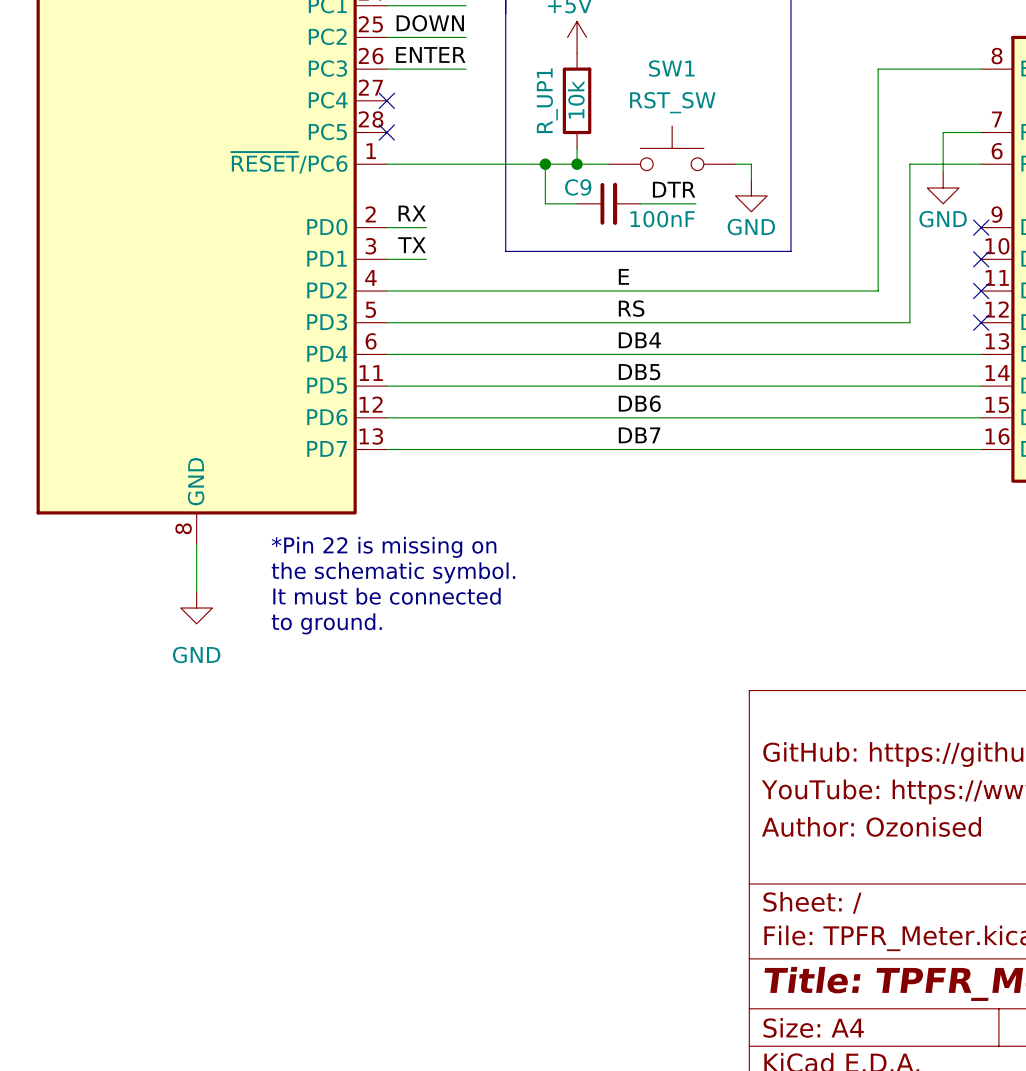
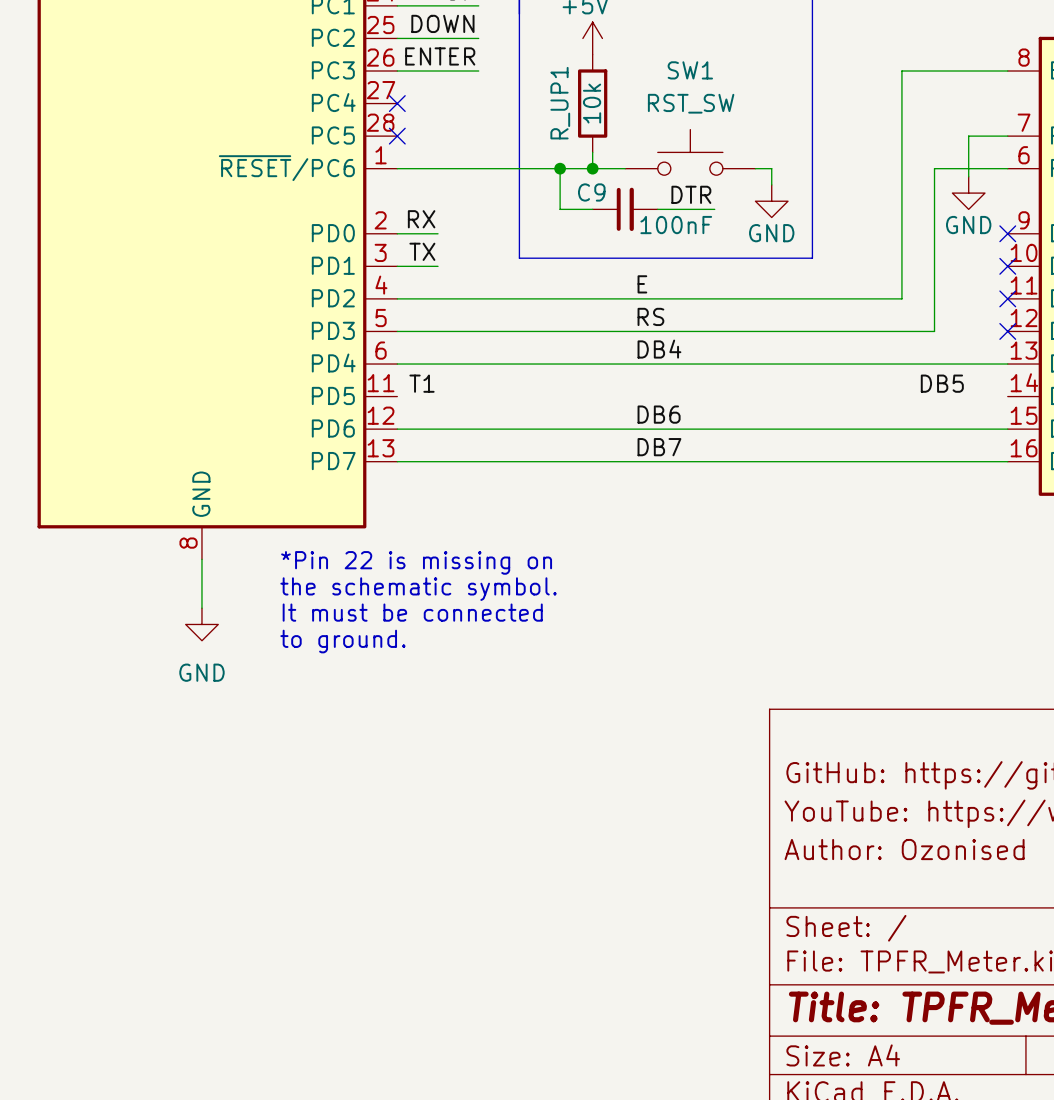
label position: DB5 (639, 372) -> DB5 (942, 383)
label: none -> T1 (422, 383)
wire: (386, 386) (981, 386) -> none

